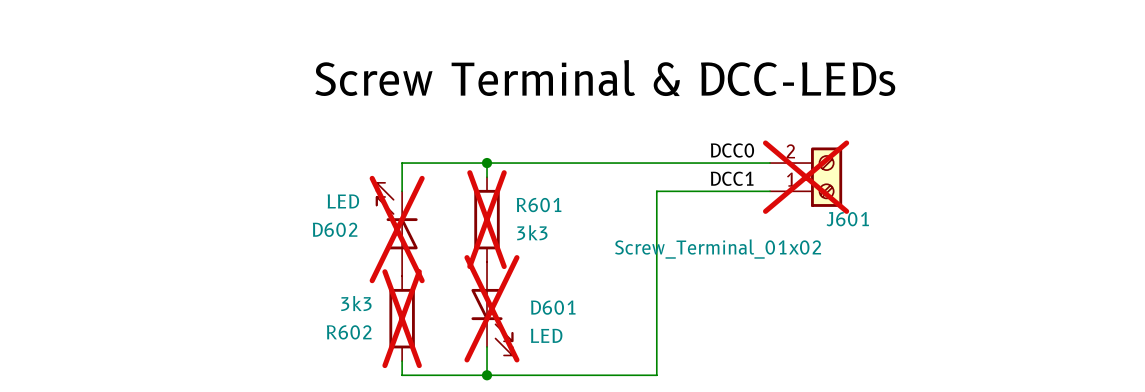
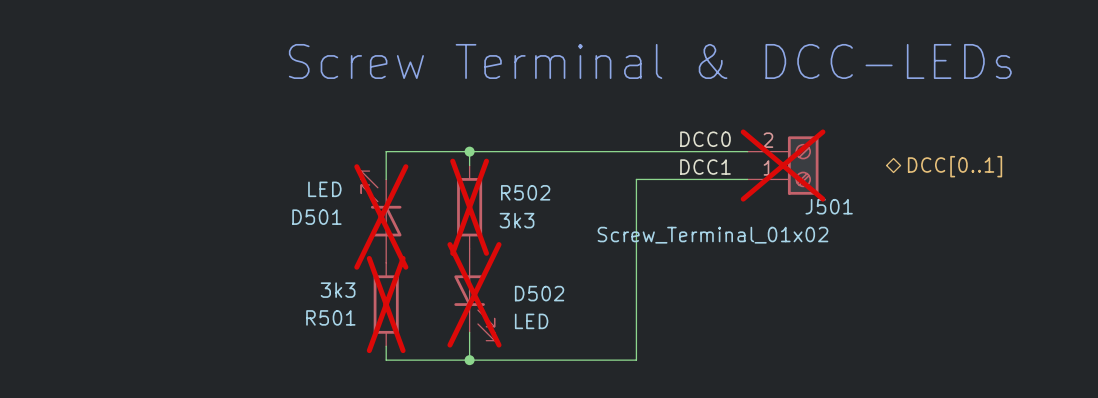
text: none -> Screw Terminal & DCC-LEDs (650, 61)
label: Screw Terminal & DCC-LEDs (605, 78) -> none
hierarchical label: none -> DCC[0..1] (955, 166)
R601 name: R601 (539, 205) -> R502 (525, 192)
J601 name: J601 (847, 219) -> J501 (829, 206)
D602 name: D602 (335, 229) -> D501 (316, 217)
D601 name: D601 (553, 307) -> D502 (539, 293)
R602 name: R602 (349, 332) -> R501 (330, 317)

